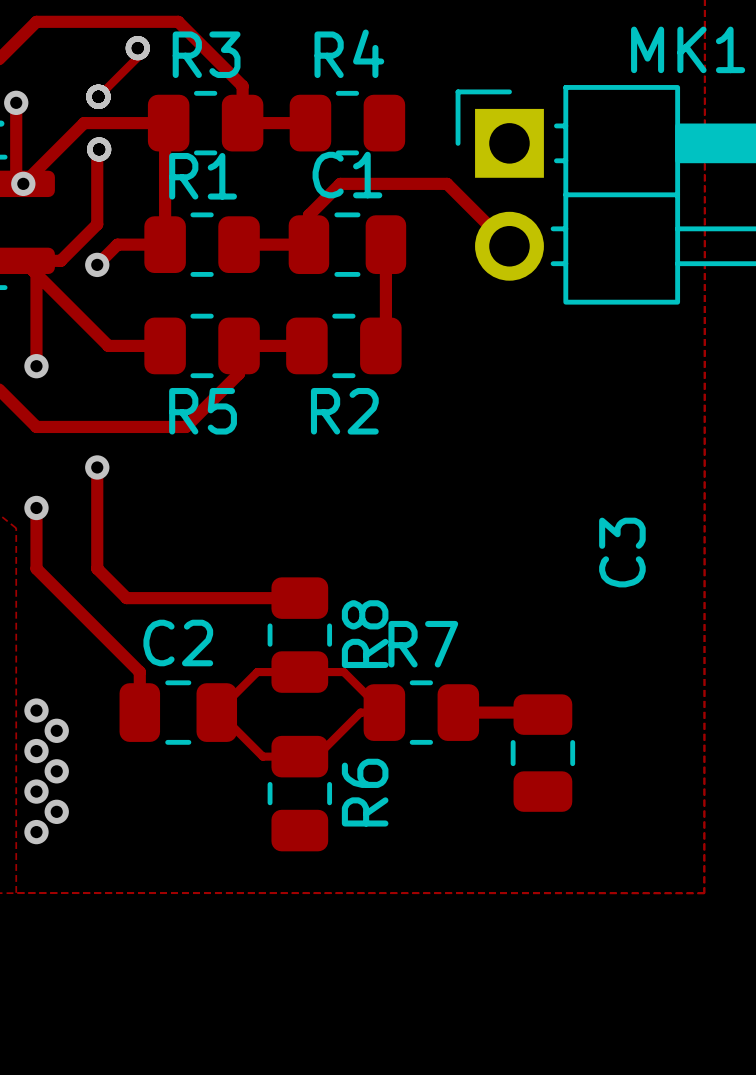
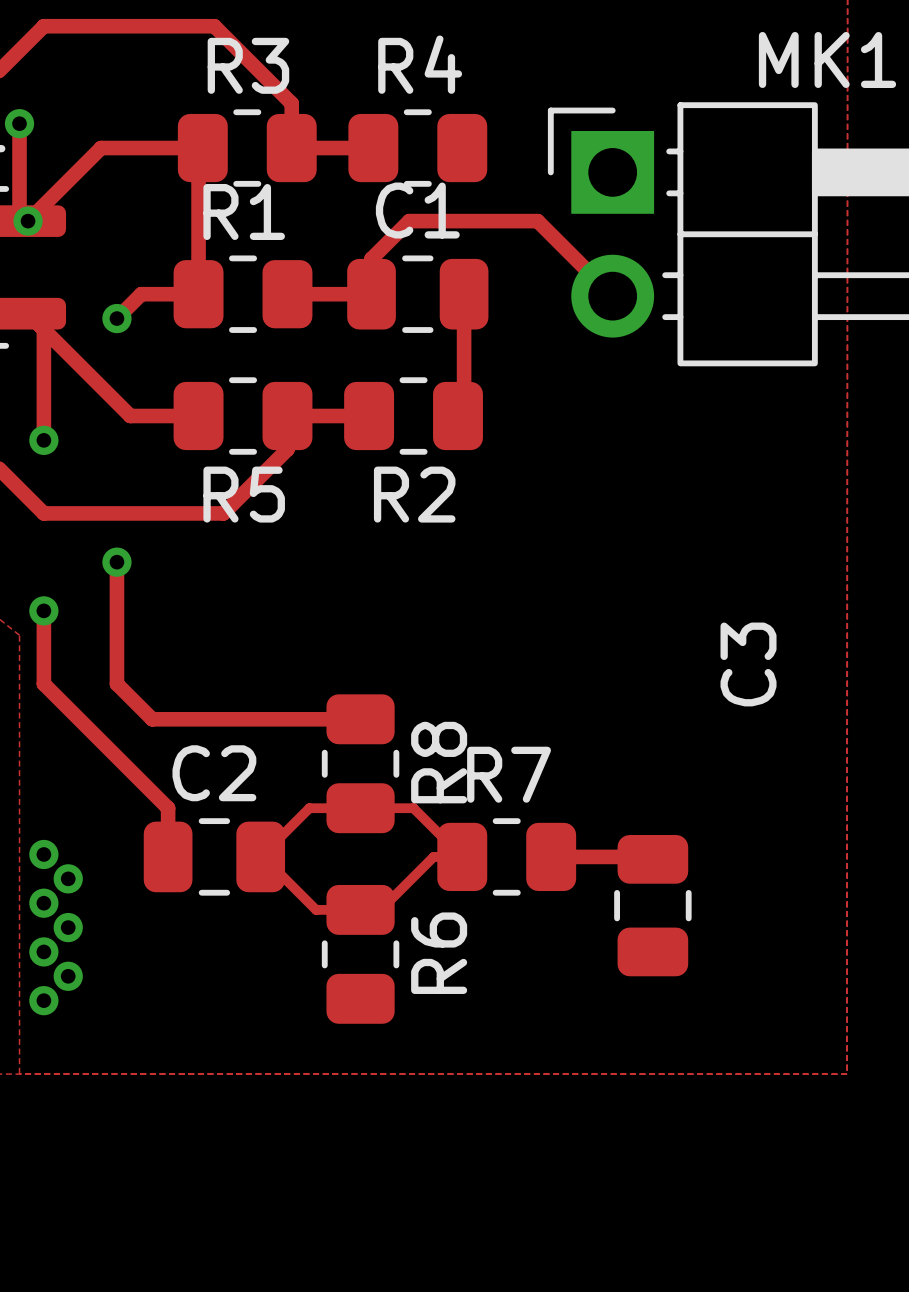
track: (137, 48) (137, 57) (97, 97) -> none
via: (137, 48) -> none
via: (98, 96) -> none
track: (99, 149) (97, 147) (97, 224) (60, 260) (23, 260) -> none
via: (99, 149) -> none

